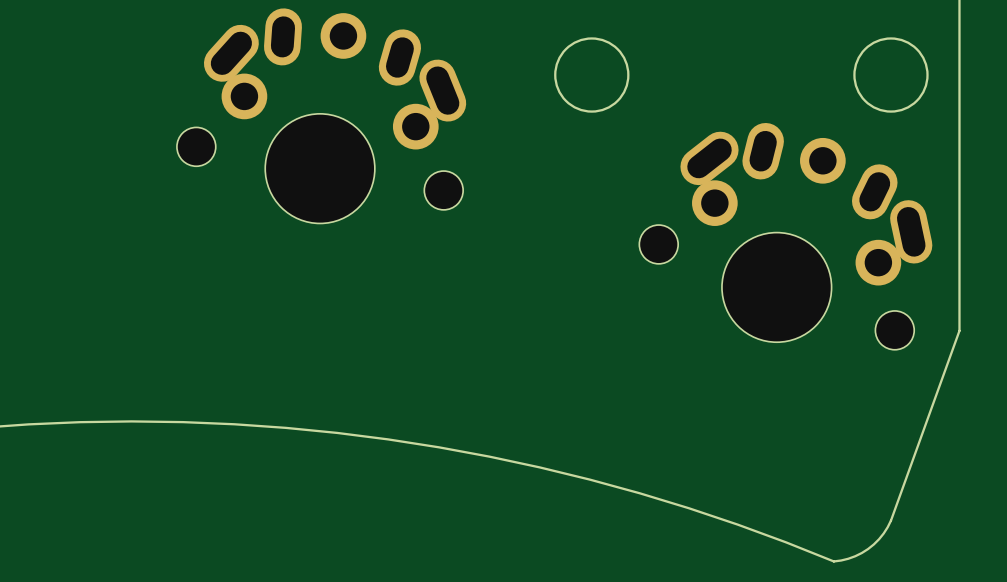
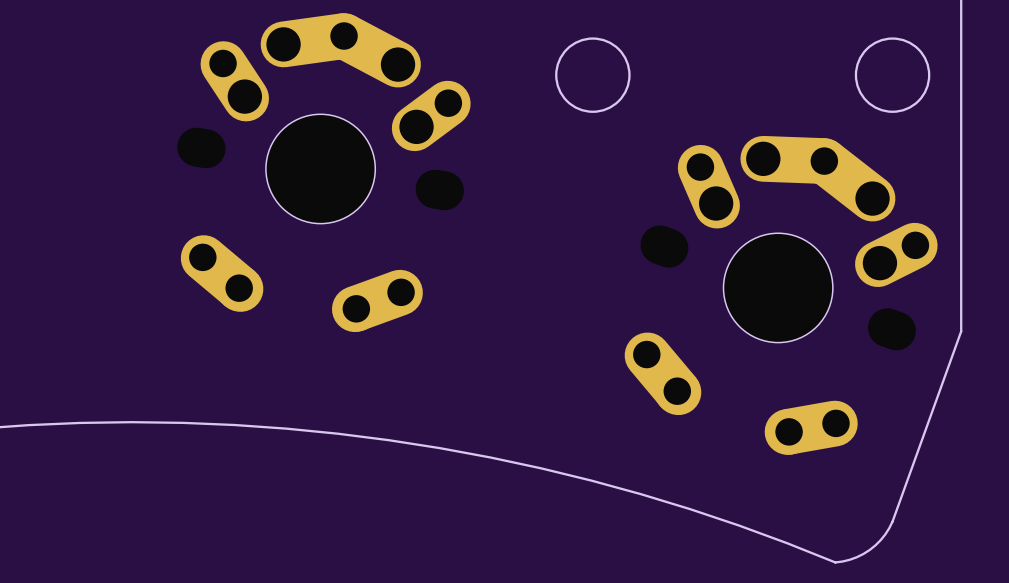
part: (321, 115) -> none
part: none -> (323, 172)
part: (785, 236) -> none
part: none -> (781, 295)

